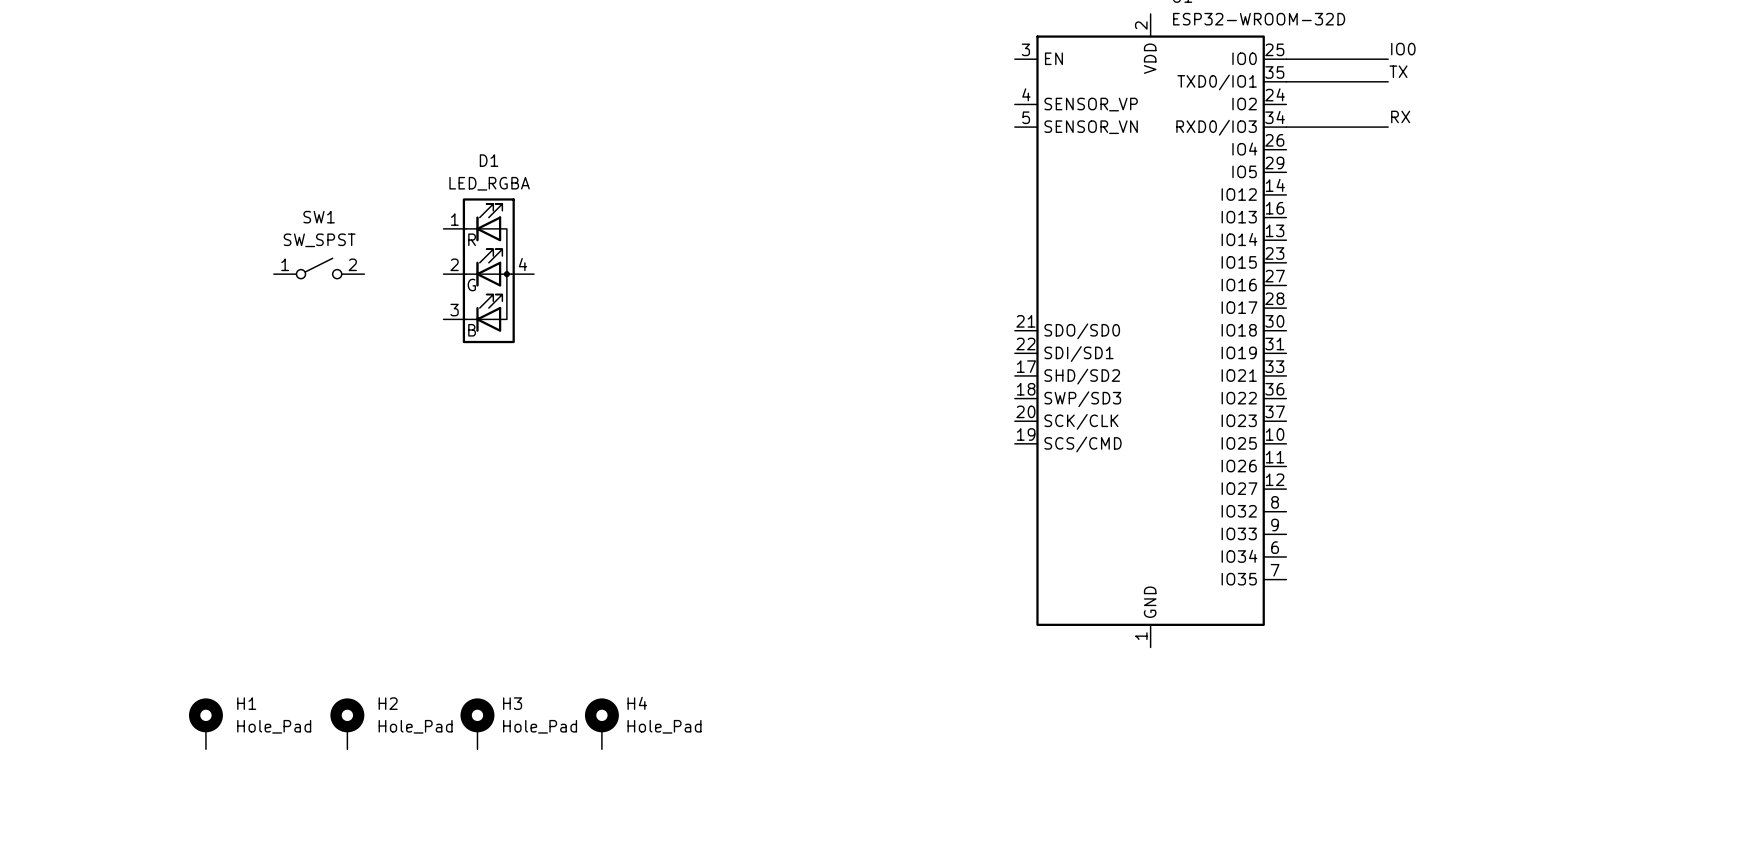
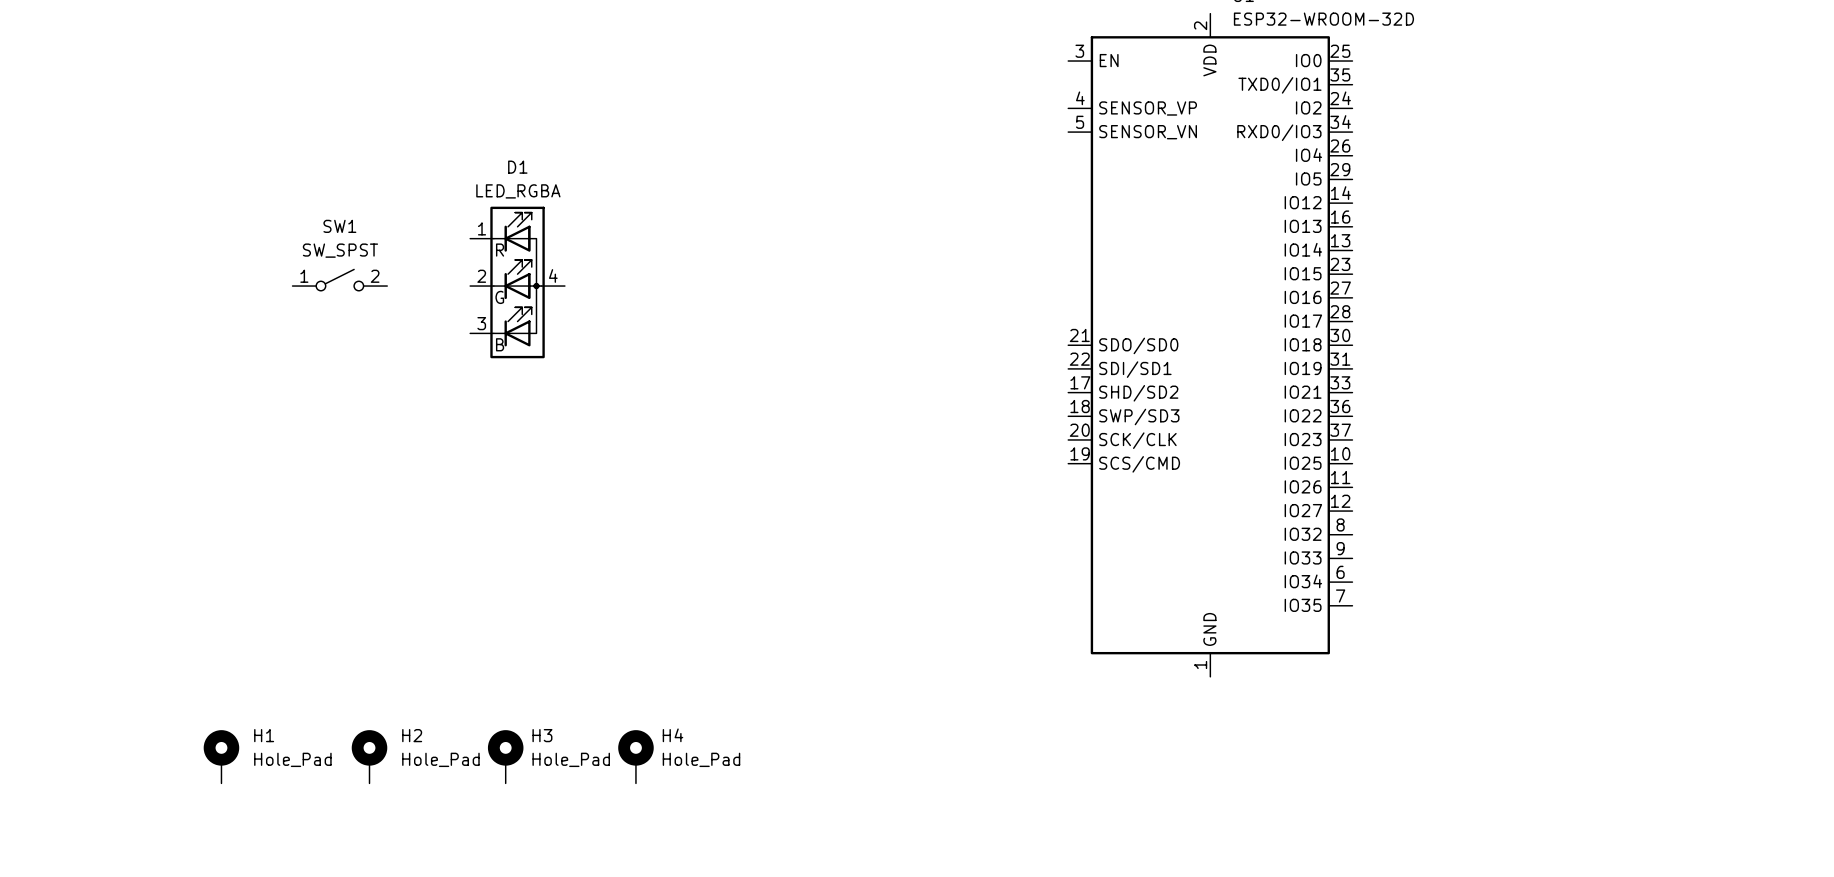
label: IO0 (1403, 49) -> none
wire: (1286, 59) (1388, 59) -> none
label: TX (1398, 71) -> none
wire: (1286, 81) (1388, 81) -> none
label: RX (1400, 116) -> none
wire: (1286, 127) (1388, 127) -> none

